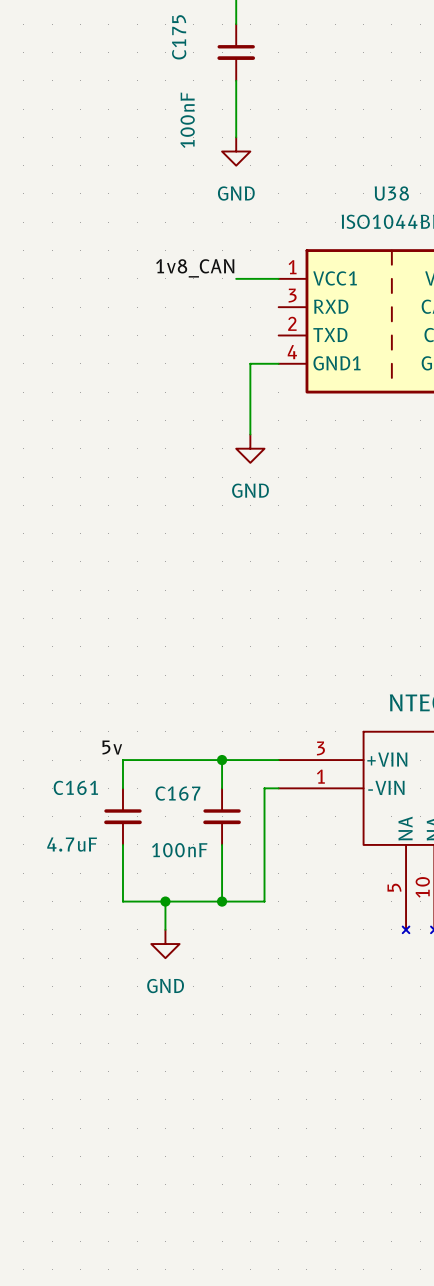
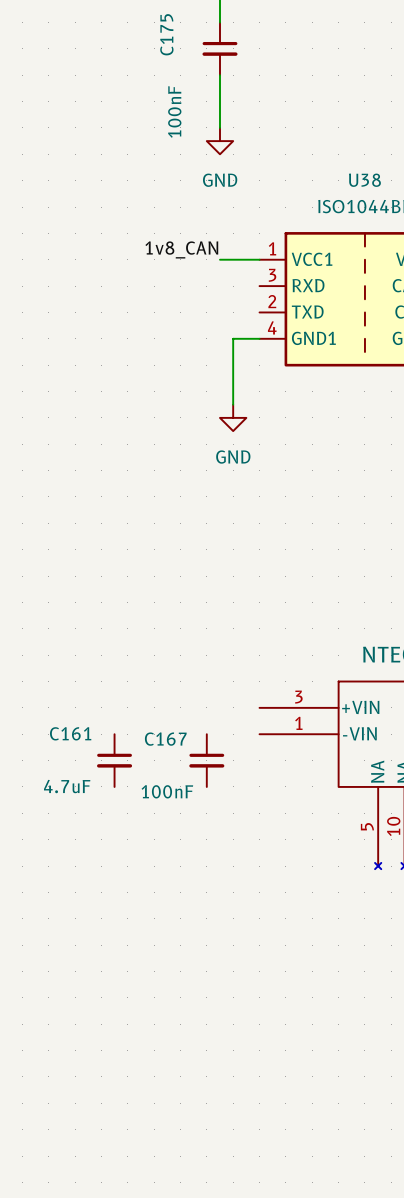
label: 5v (112, 747) -> none
wire: (222, 760) (222, 788) -> none
junction: (222, 760) -> none
wire: (278, 760) (122, 760) (122, 788) -> none
wire: (278, 788) (264, 788) (264, 901) (122, 901) (122, 844) -> none
wire: (222, 844) (222, 901) -> none
wire: (165, 901) (165, 929) -> none
junction: (165, 901) -> none
junction: (222, 901) -> none
power symbol: GND (165, 944) -> none

